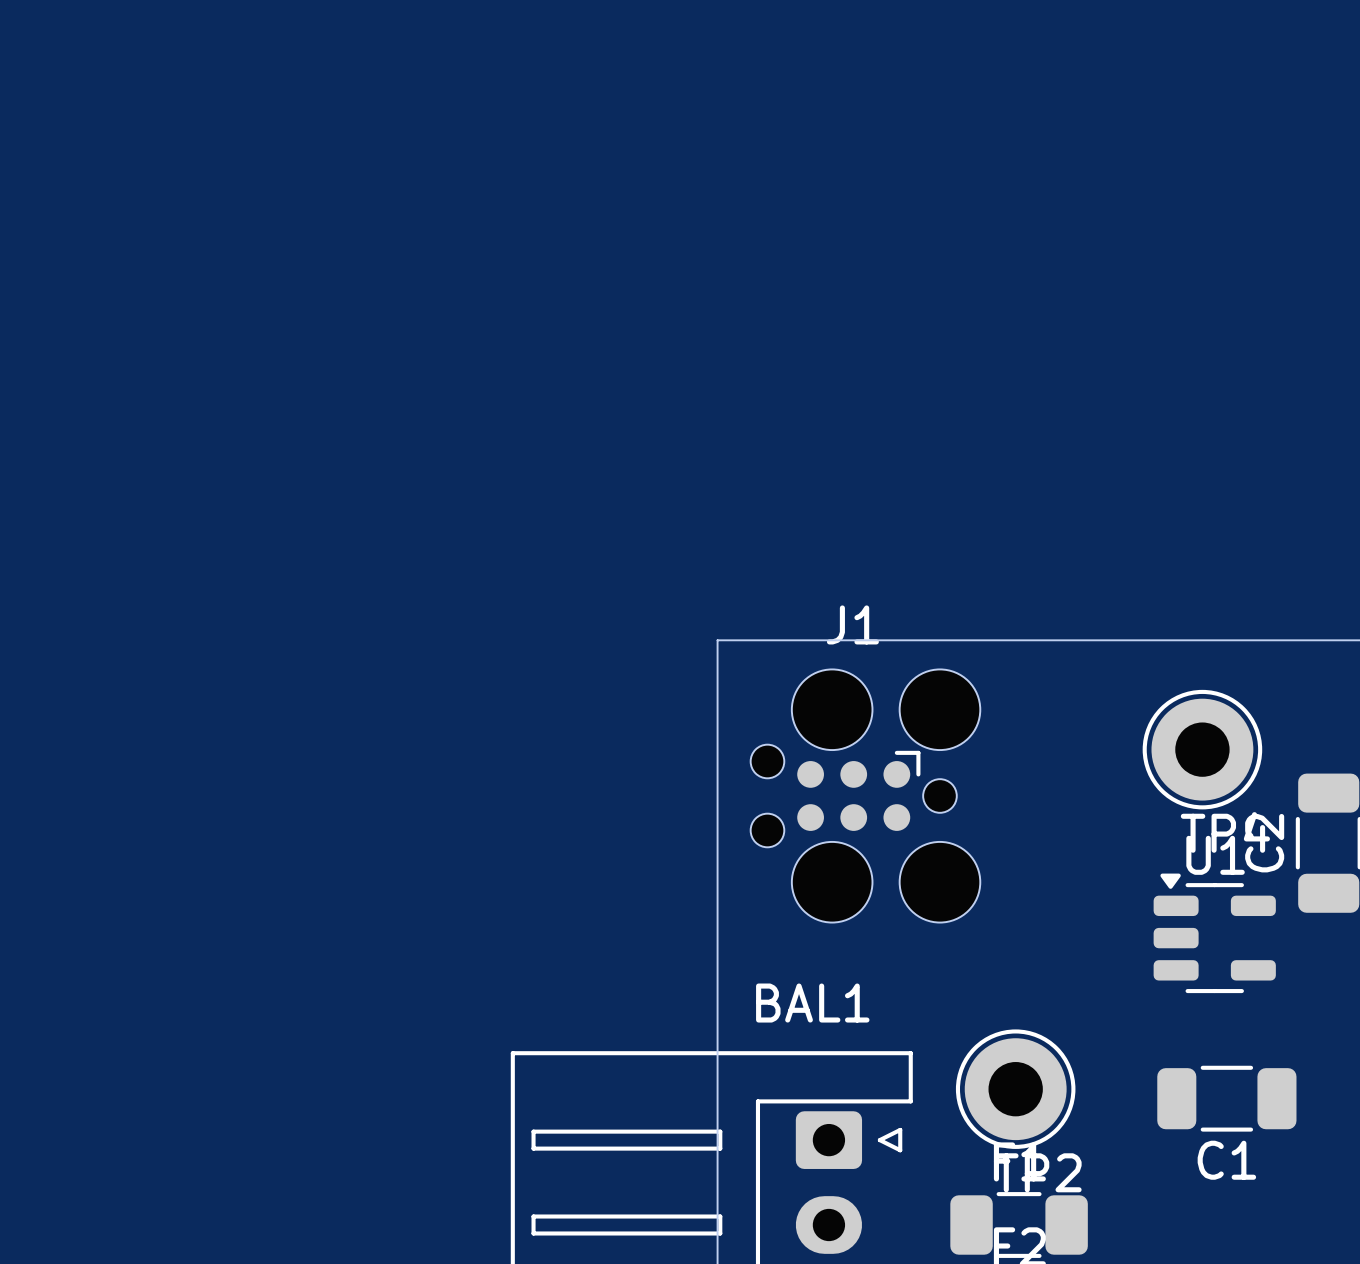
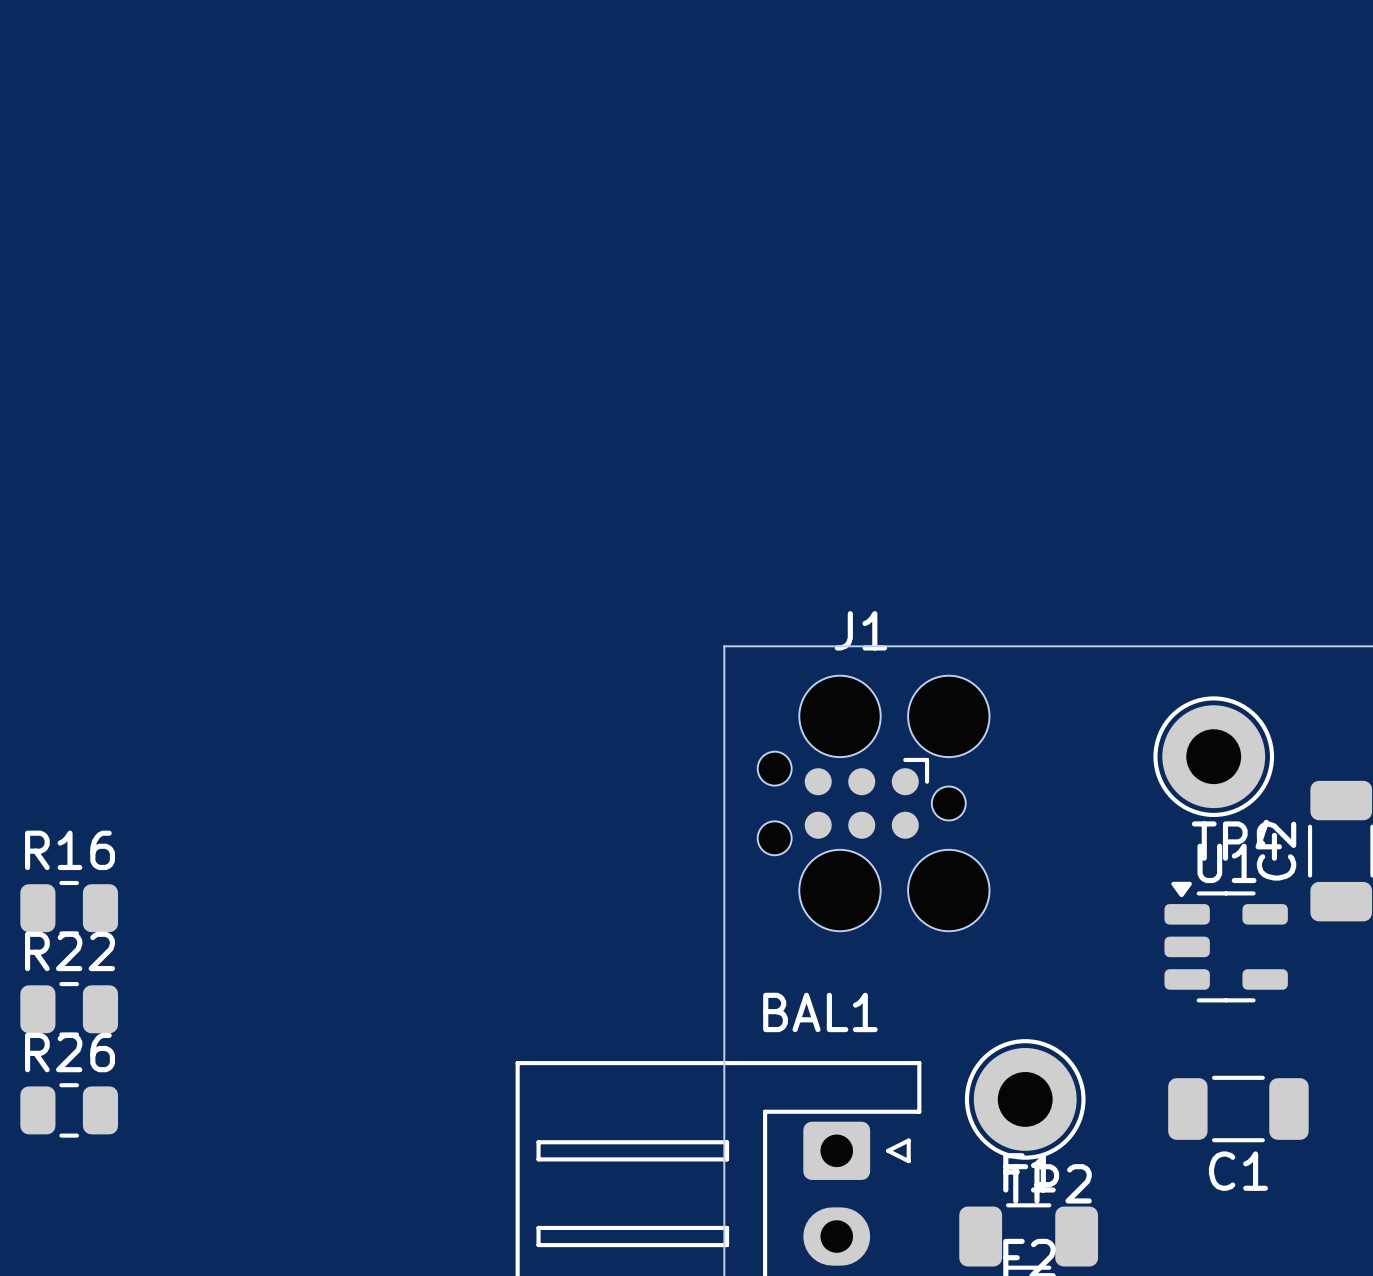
R16: none -> (69, 908)
R22: none -> (69, 1009)
R26: none -> (69, 1110)

